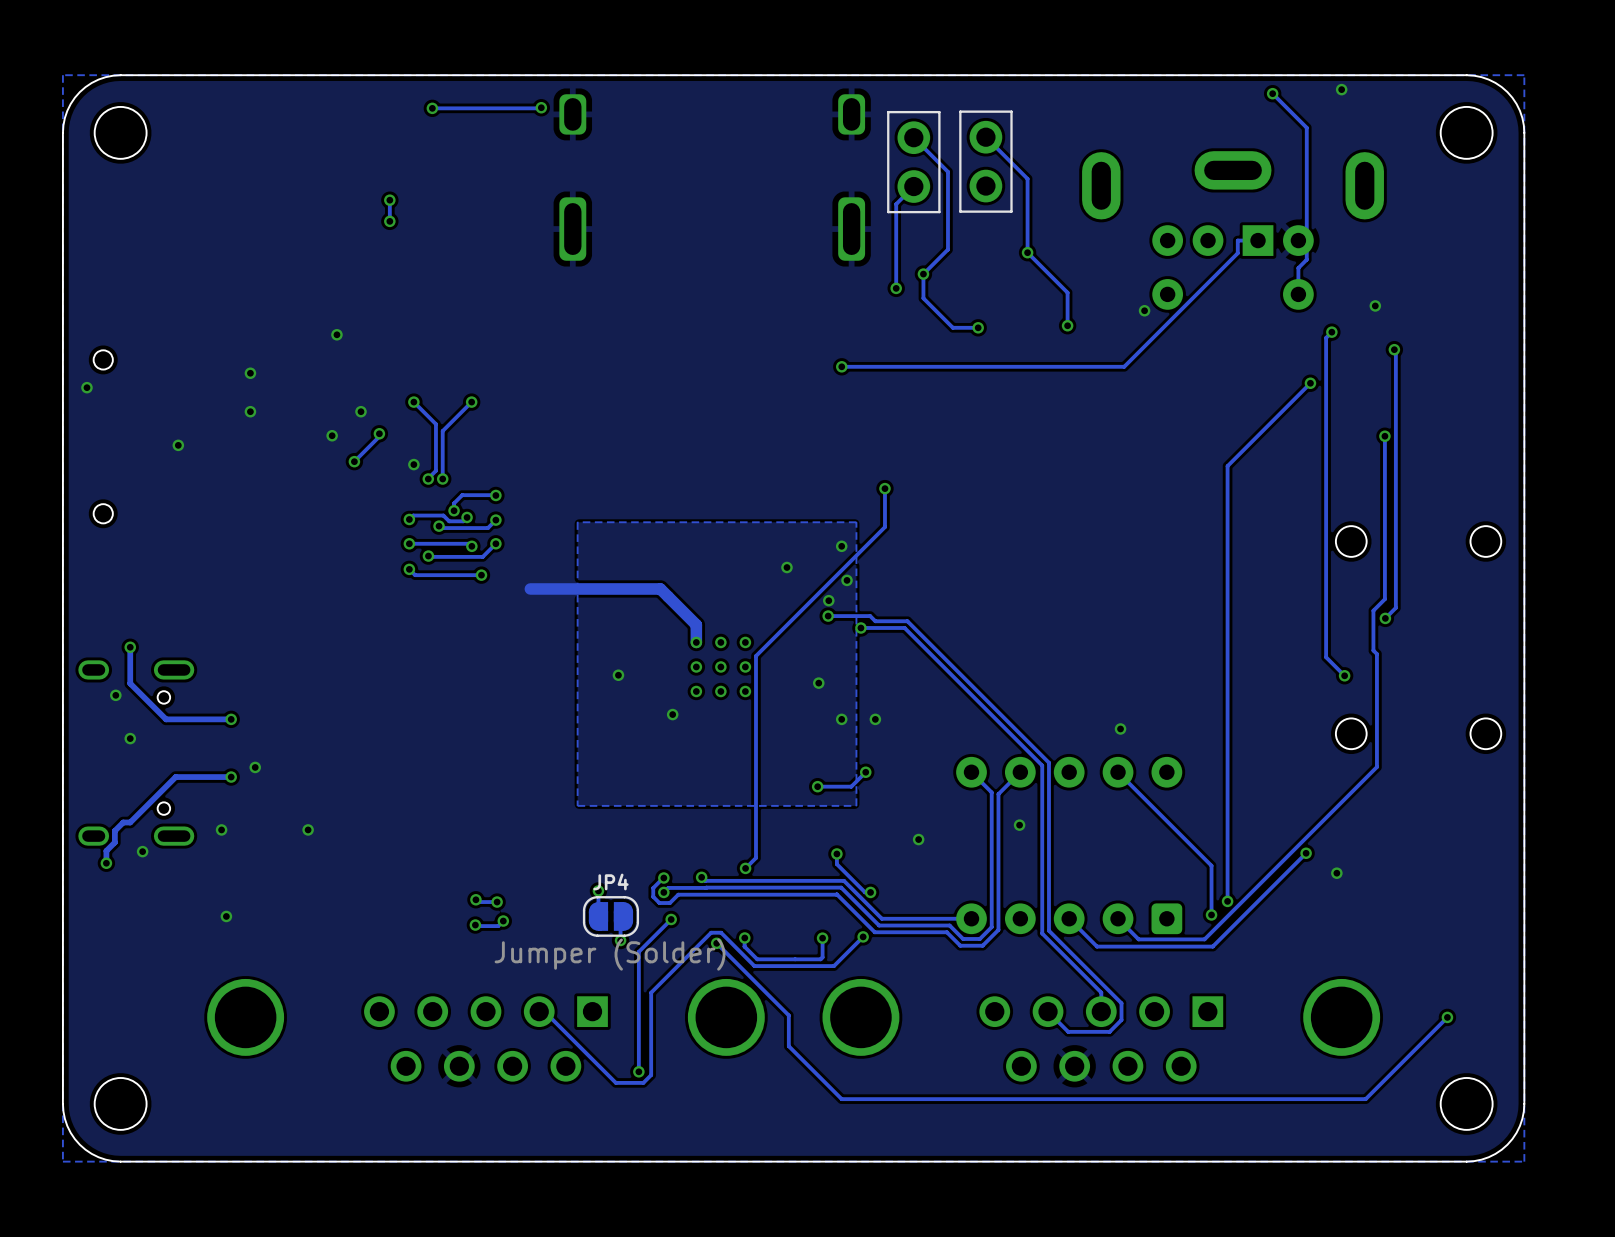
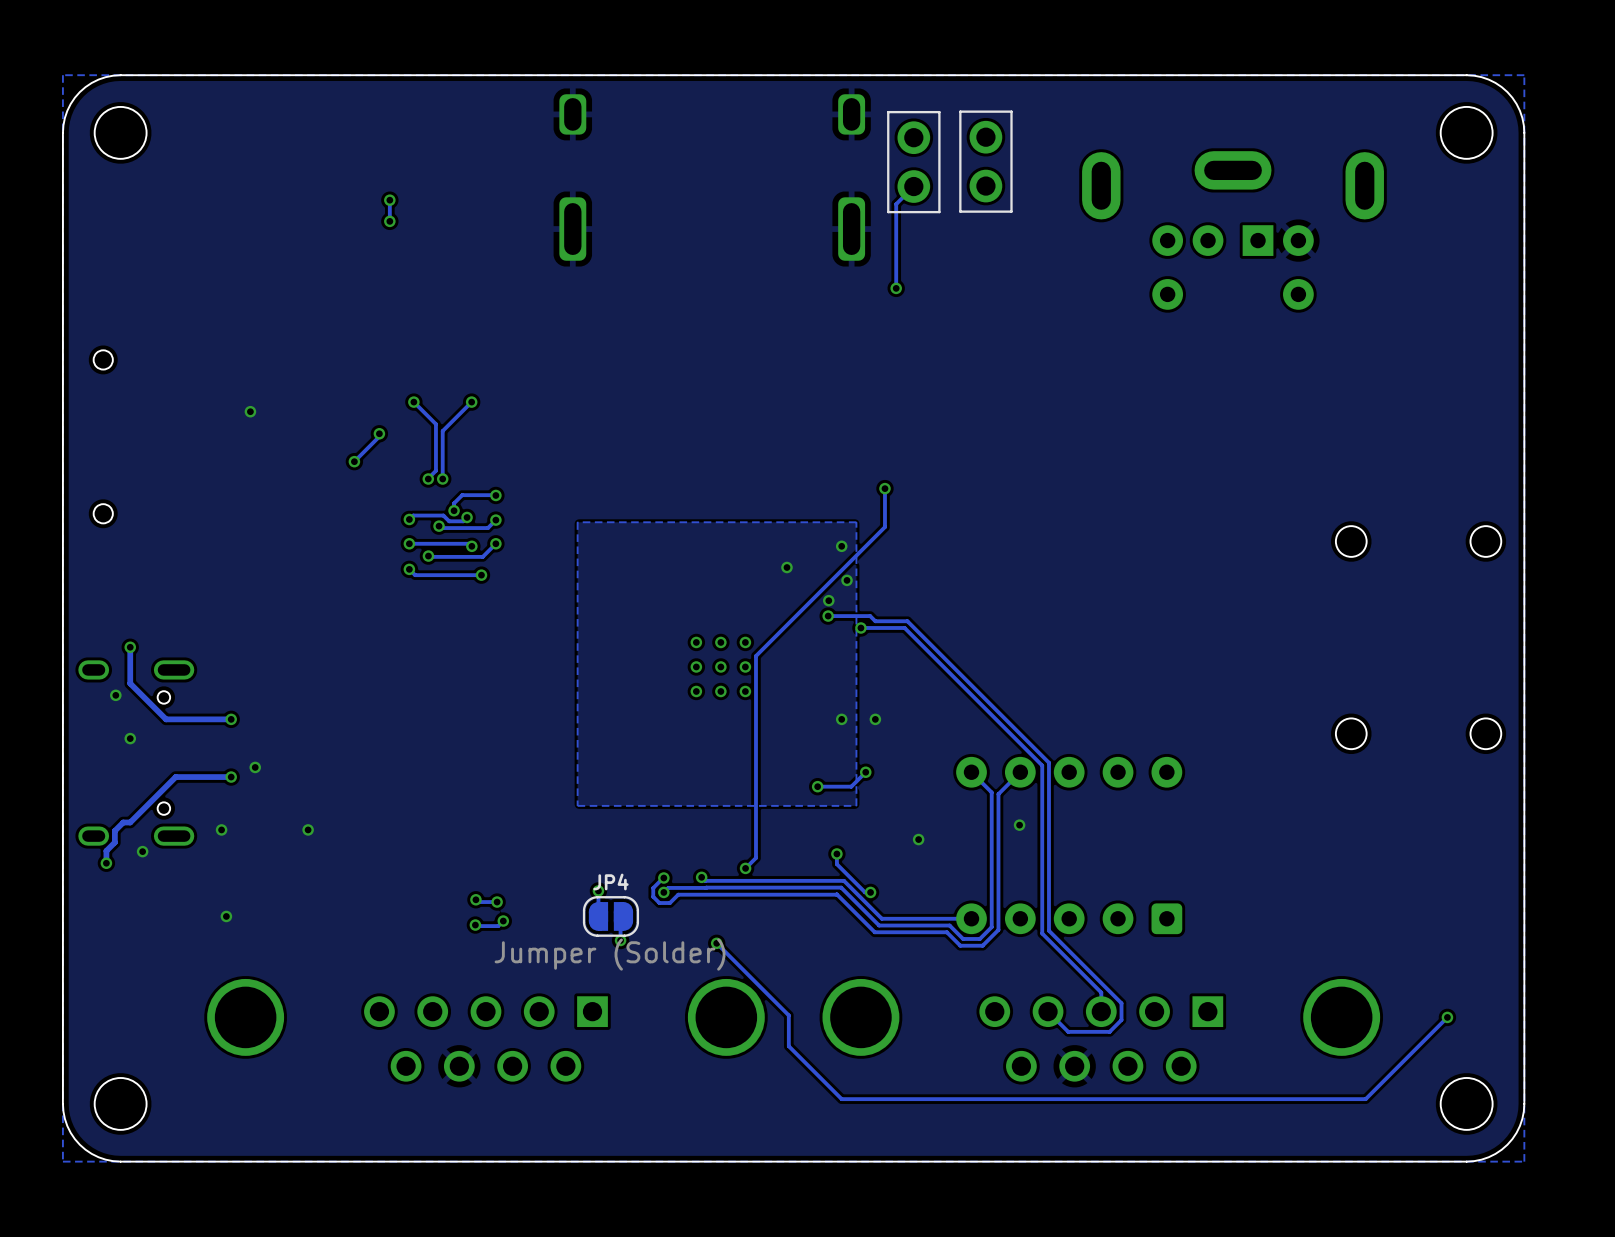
via: (1341, 89) -> none
track: (1272, 93) (1306, 127) (1306, 259) (1298, 268) (1298, 294) -> none
via: (1272, 93) -> none
track: (541, 107) (432, 108) -> none
via: (541, 107) -> none
via: (432, 108) -> none
track: (913, 137) (947, 171) (947, 249) (923, 274) (923, 298) (952, 327) (978, 327) -> none
track: (985, 137) (1027, 178) (1027, 252) (1067, 292) (1067, 325) -> none
track: (1258, 240) (1237, 240) (1237, 253) (1124, 366) (841, 366) -> none
via: (1027, 252) -> none
via: (923, 274) -> none
via: (1375, 305) -> none
via: (1144, 310) -> none
via: (1067, 325) -> none
via: (978, 327) -> none
track: (1331, 332) (1326, 337) (1326, 657) (1344, 675) -> none
via: (1331, 332) -> none
via: (336, 334) -> none
track: (1394, 349) (1395, 351) (1395, 607) (1385, 618) -> none
via: (1394, 349) -> none
via: (841, 366) -> none
via: (250, 373) -> none
track: (1310, 383) (1227, 466) (1227, 901) -> none
via: (1310, 383) -> none
via: (86, 387) -> none
via: (360, 411) -> none
via: (332, 435) -> none
track: (1384, 436) (1384, 599) (1373, 610) (1373, 650) (1376, 654) (1376, 767) (1204, 939) (1138, 939) (1118, 918) -> none
via: (1384, 436) -> none
via: (178, 445) -> none
via: (413, 464) -> none
track: (530, 588) (660, 588) (696, 624) (696, 642) -> none
via: (1385, 618) -> none
via: (618, 675) -> none
via: (1344, 675) -> none
via: (818, 683) -> none
via: (672, 714) -> none
via: (1120, 728) -> none
track: (1118, 772) (1211, 865) (1211, 914) -> none
track: (1306, 853) (1212, 946) (1097, 946) (1069, 918) -> none
via: (1306, 853) -> none
via: (1336, 873) -> none
via: (1227, 901) -> none
via: (1211, 914) -> none
track: (671, 919) (638, 951) (638, 1071) -> none
via: (671, 919) -> none
track: (863, 936) (833, 966) (754, 966) (721, 932) (711, 932) (651, 992) (651, 1075) (643, 1082) (615, 1082) (544, 1011) (539, 1011) -> none
via: (863, 936) -> none
via: (744, 937) -> none
track: (822, 938) (822, 957) (820, 959) (757, 959) (744, 946) (744, 940) -> none
via: (822, 938) -> none
via: (638, 1071) -> none

